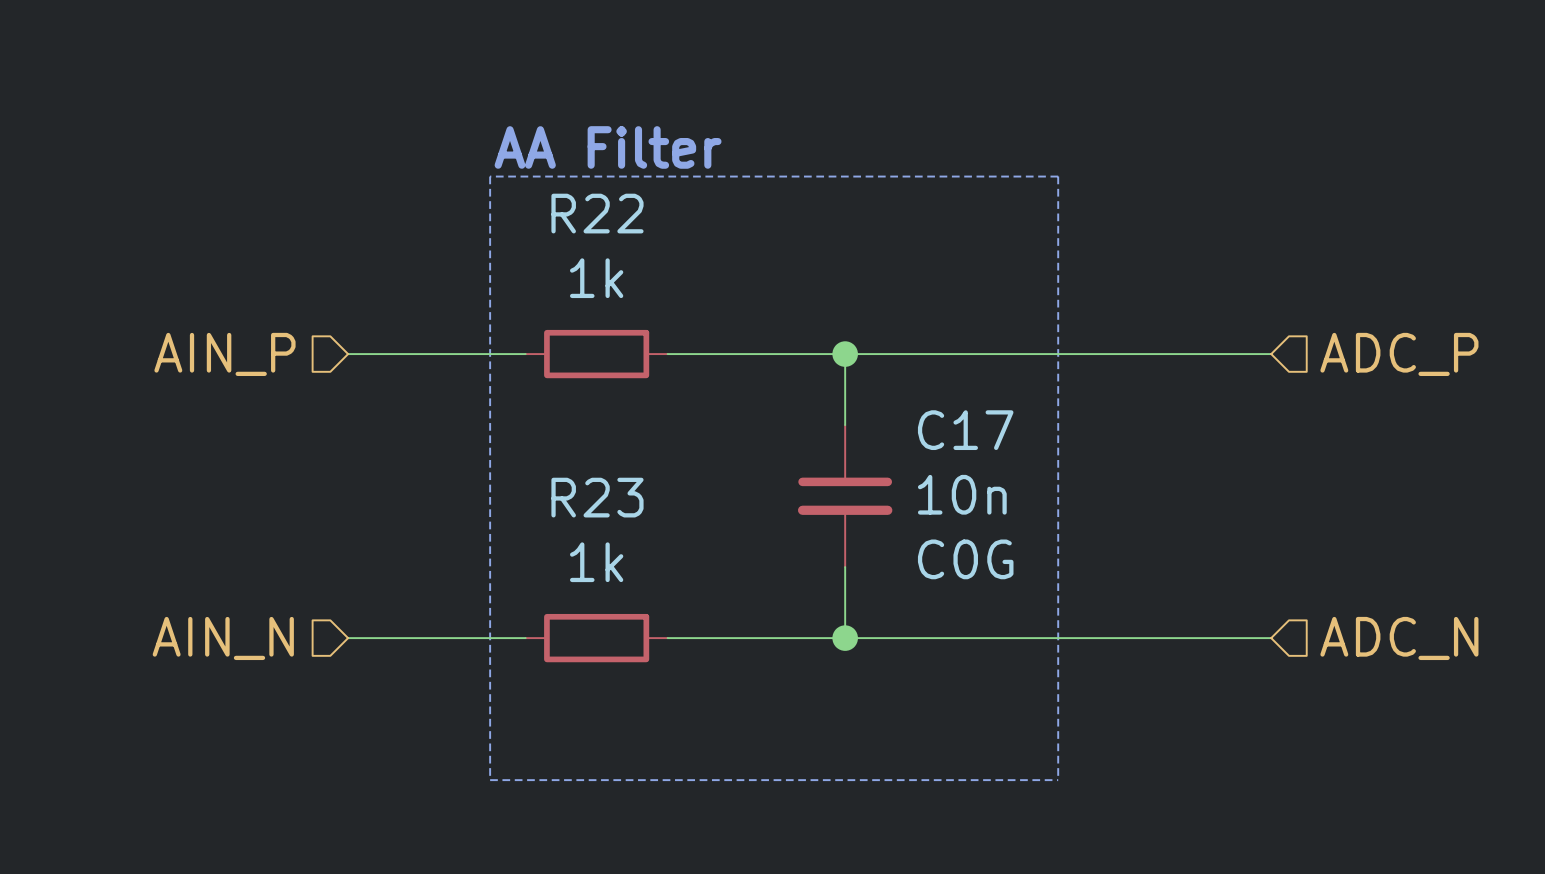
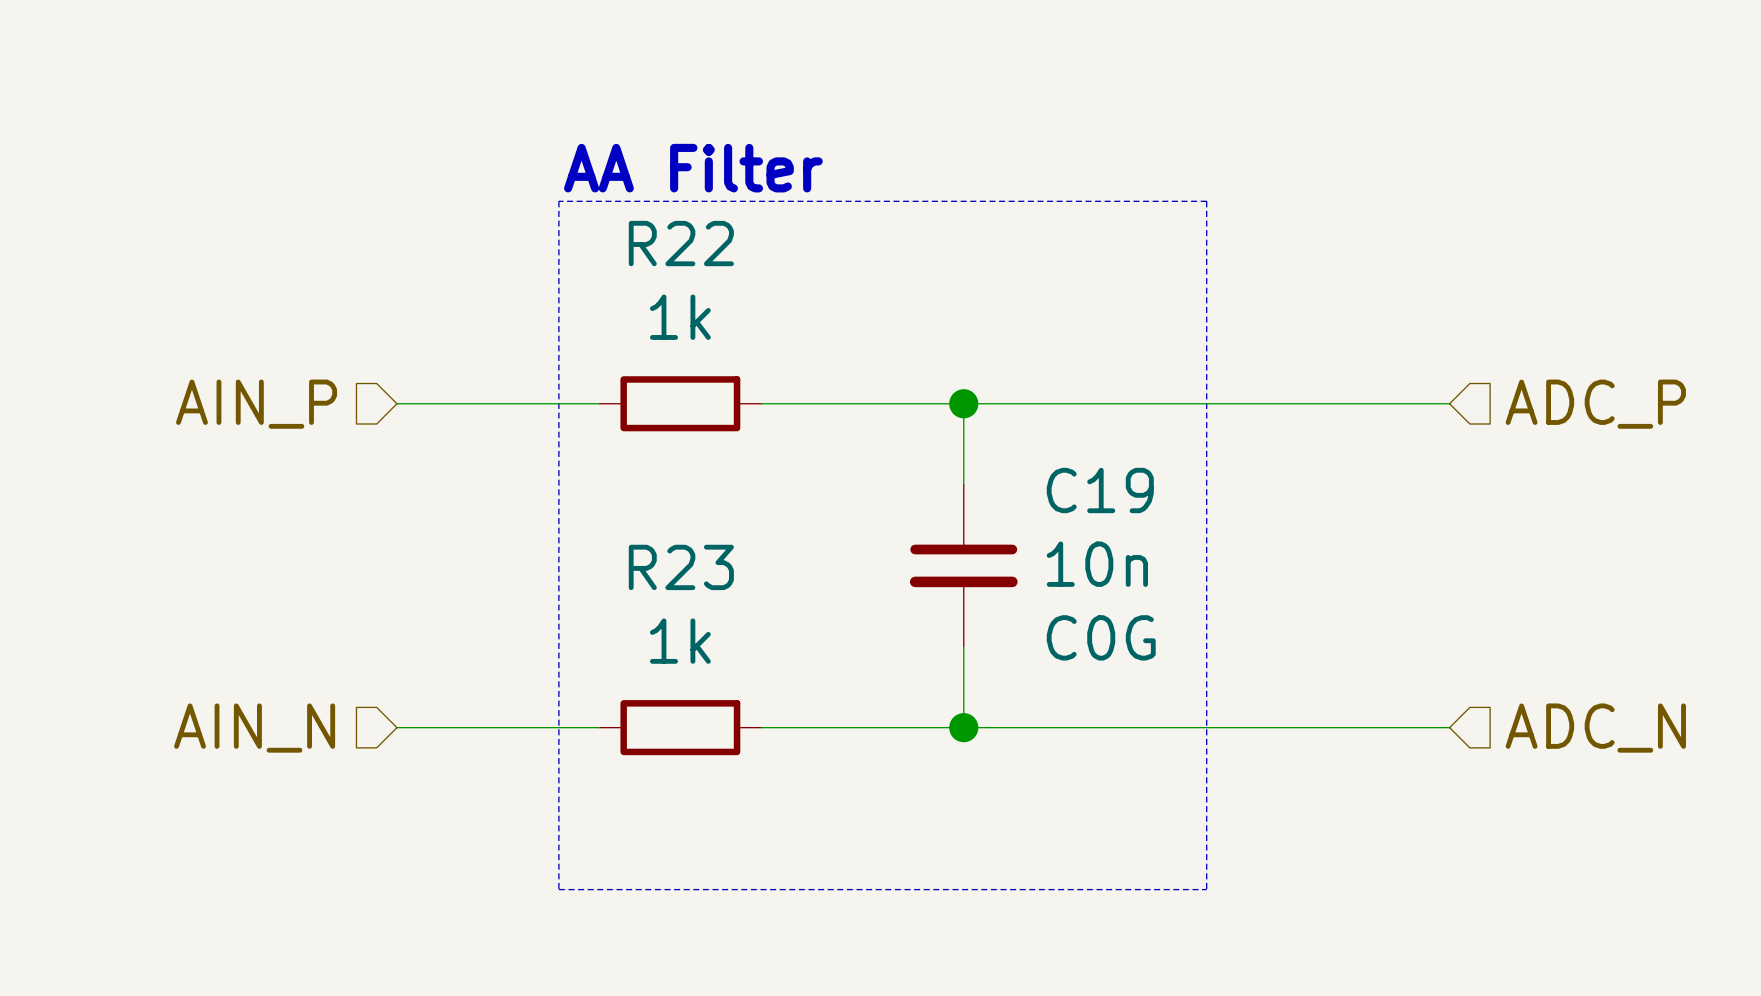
C17 name: C17 (965, 430) -> C19 (1100, 490)

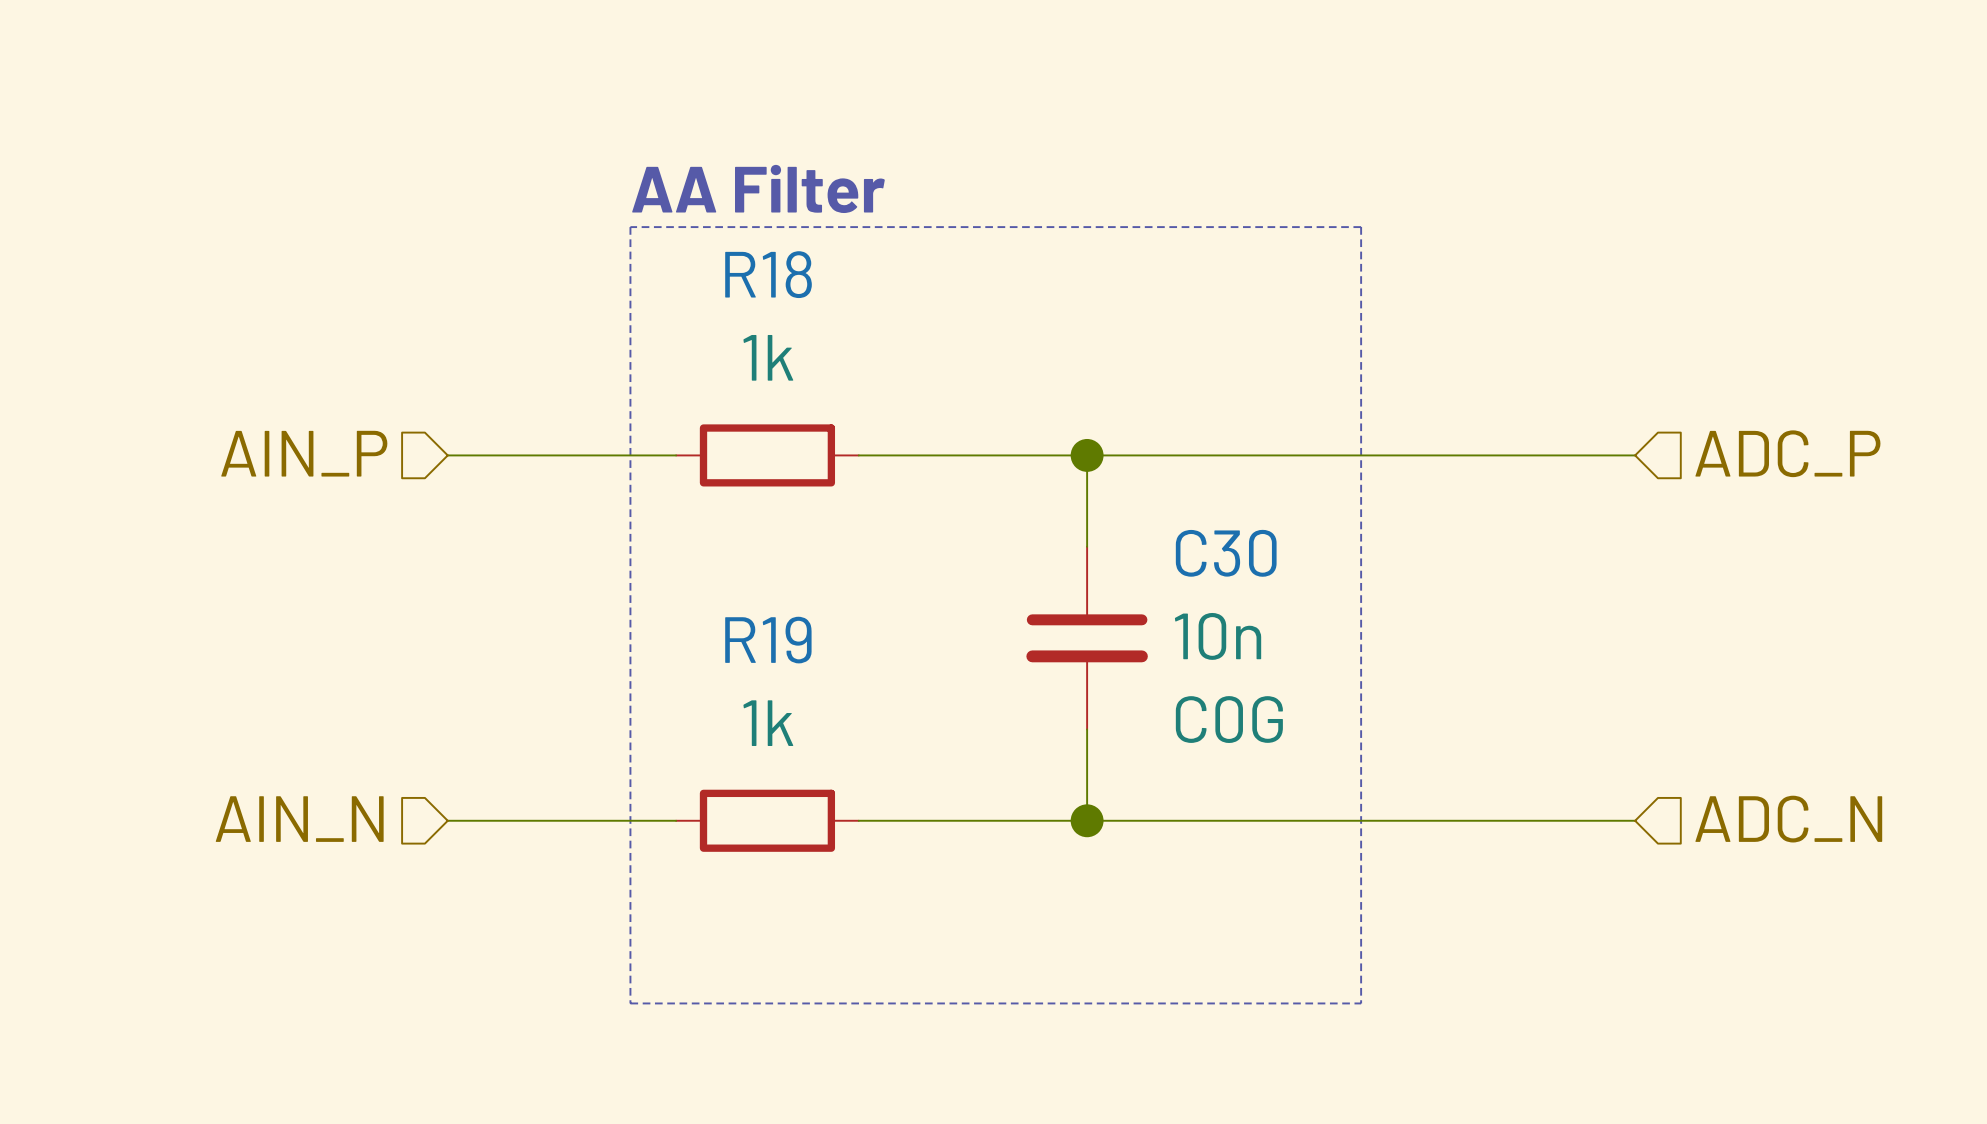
R22 name: R22 (681, 243) -> R18 (768, 274)
C19 name: C19 (1100, 490) -> C30 (1226, 553)
R23 name: R23 (681, 567) -> R19 (768, 640)

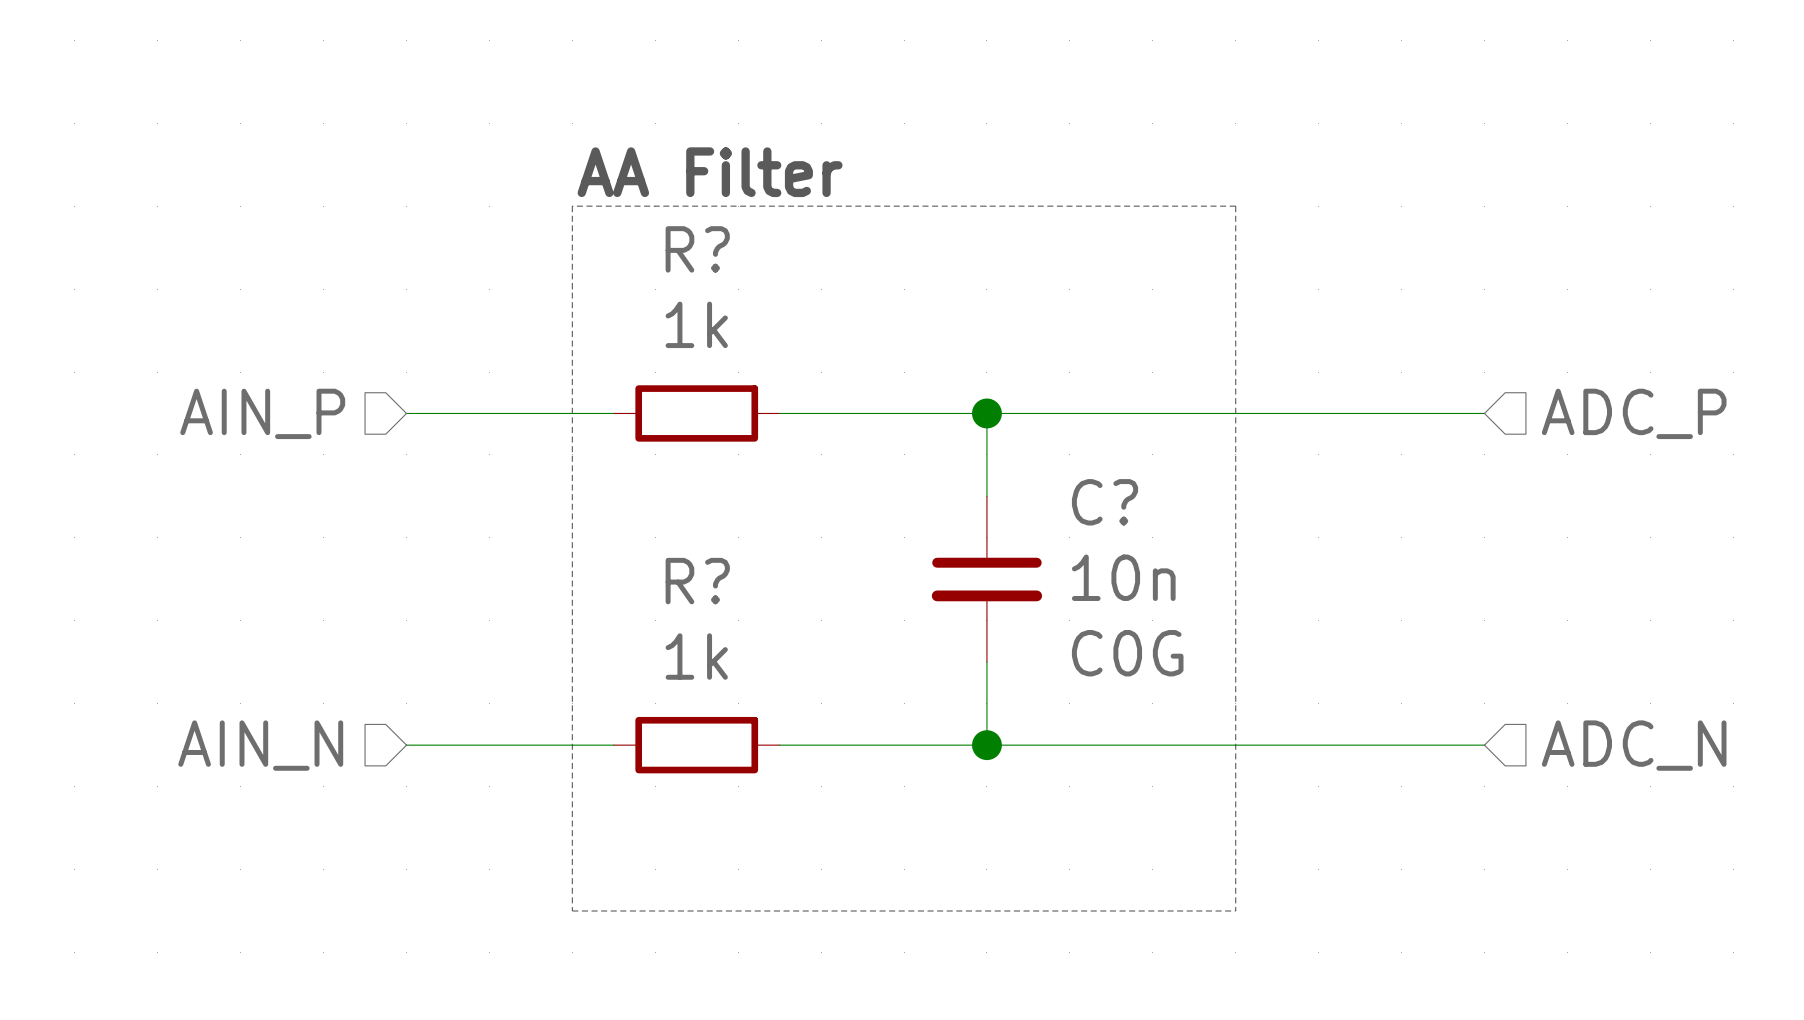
R18 name: R18 (768, 274) -> R? (697, 249)
C30 name: C30 (1226, 553) -> C? (1105, 502)
R19 name: R19 (768, 640) -> R? (697, 581)

